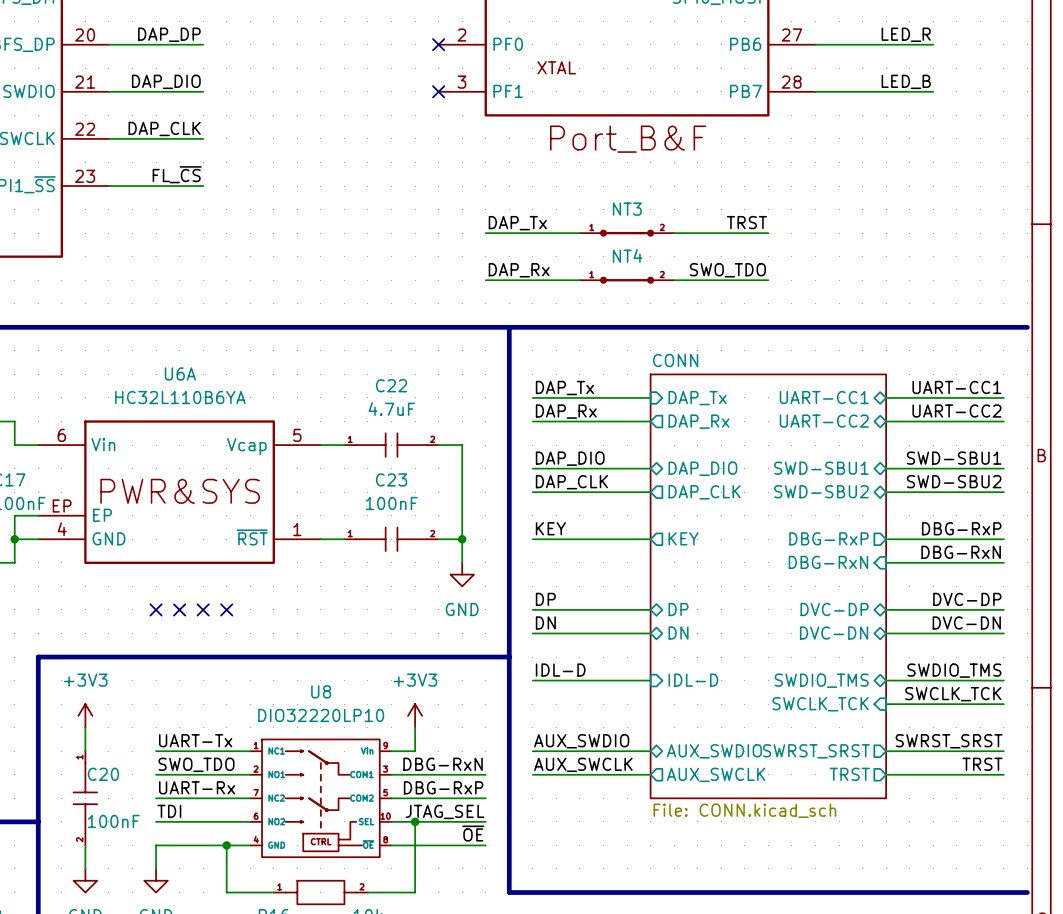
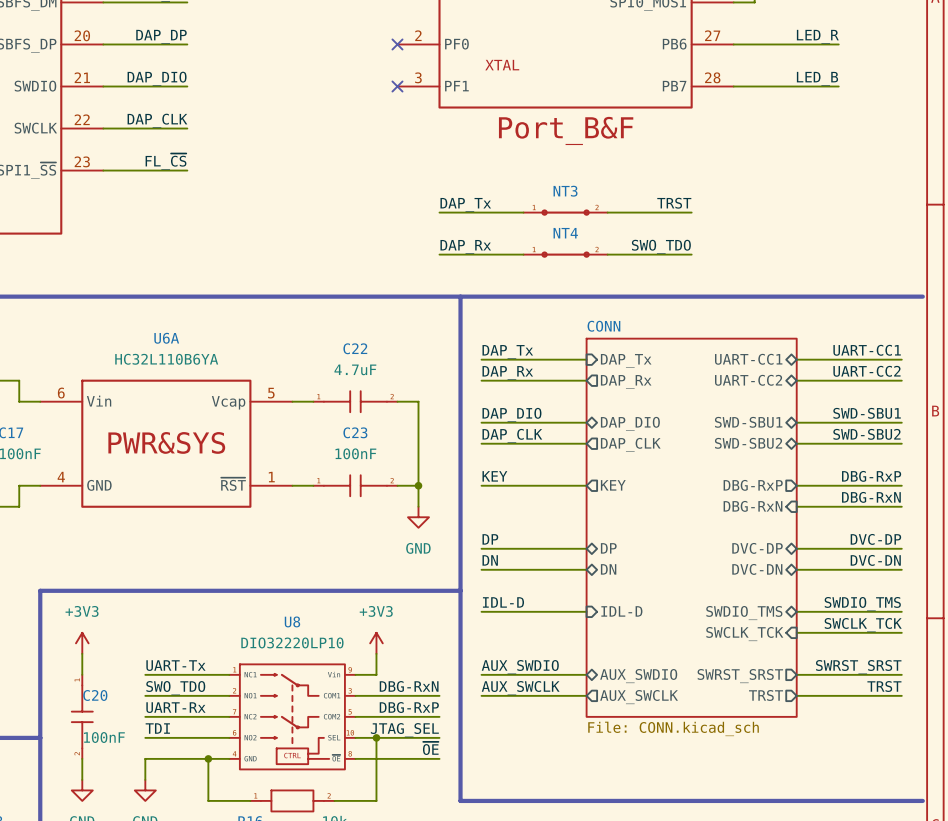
U6A symbol: [38, 420, 321, 565] -> [40, 379, 293, 508]
wire: (38, 515) (14, 515) (14, 539) -> none
junction: (14, 539) -> none
no-connect mark: (156, 609) -> none
no-connect mark: (179, 609) -> none
no-connect mark: (203, 609) -> none
no-connect mark: (226, 609) -> none

